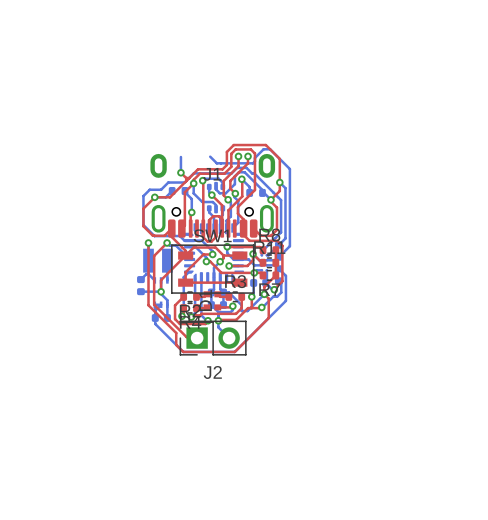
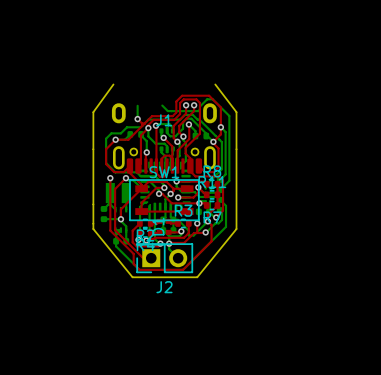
board edge: none -> (113, 84) (93, 112) (93, 229) (132, 277) (197, 277) (236, 229) (236, 112) (215, 84)

